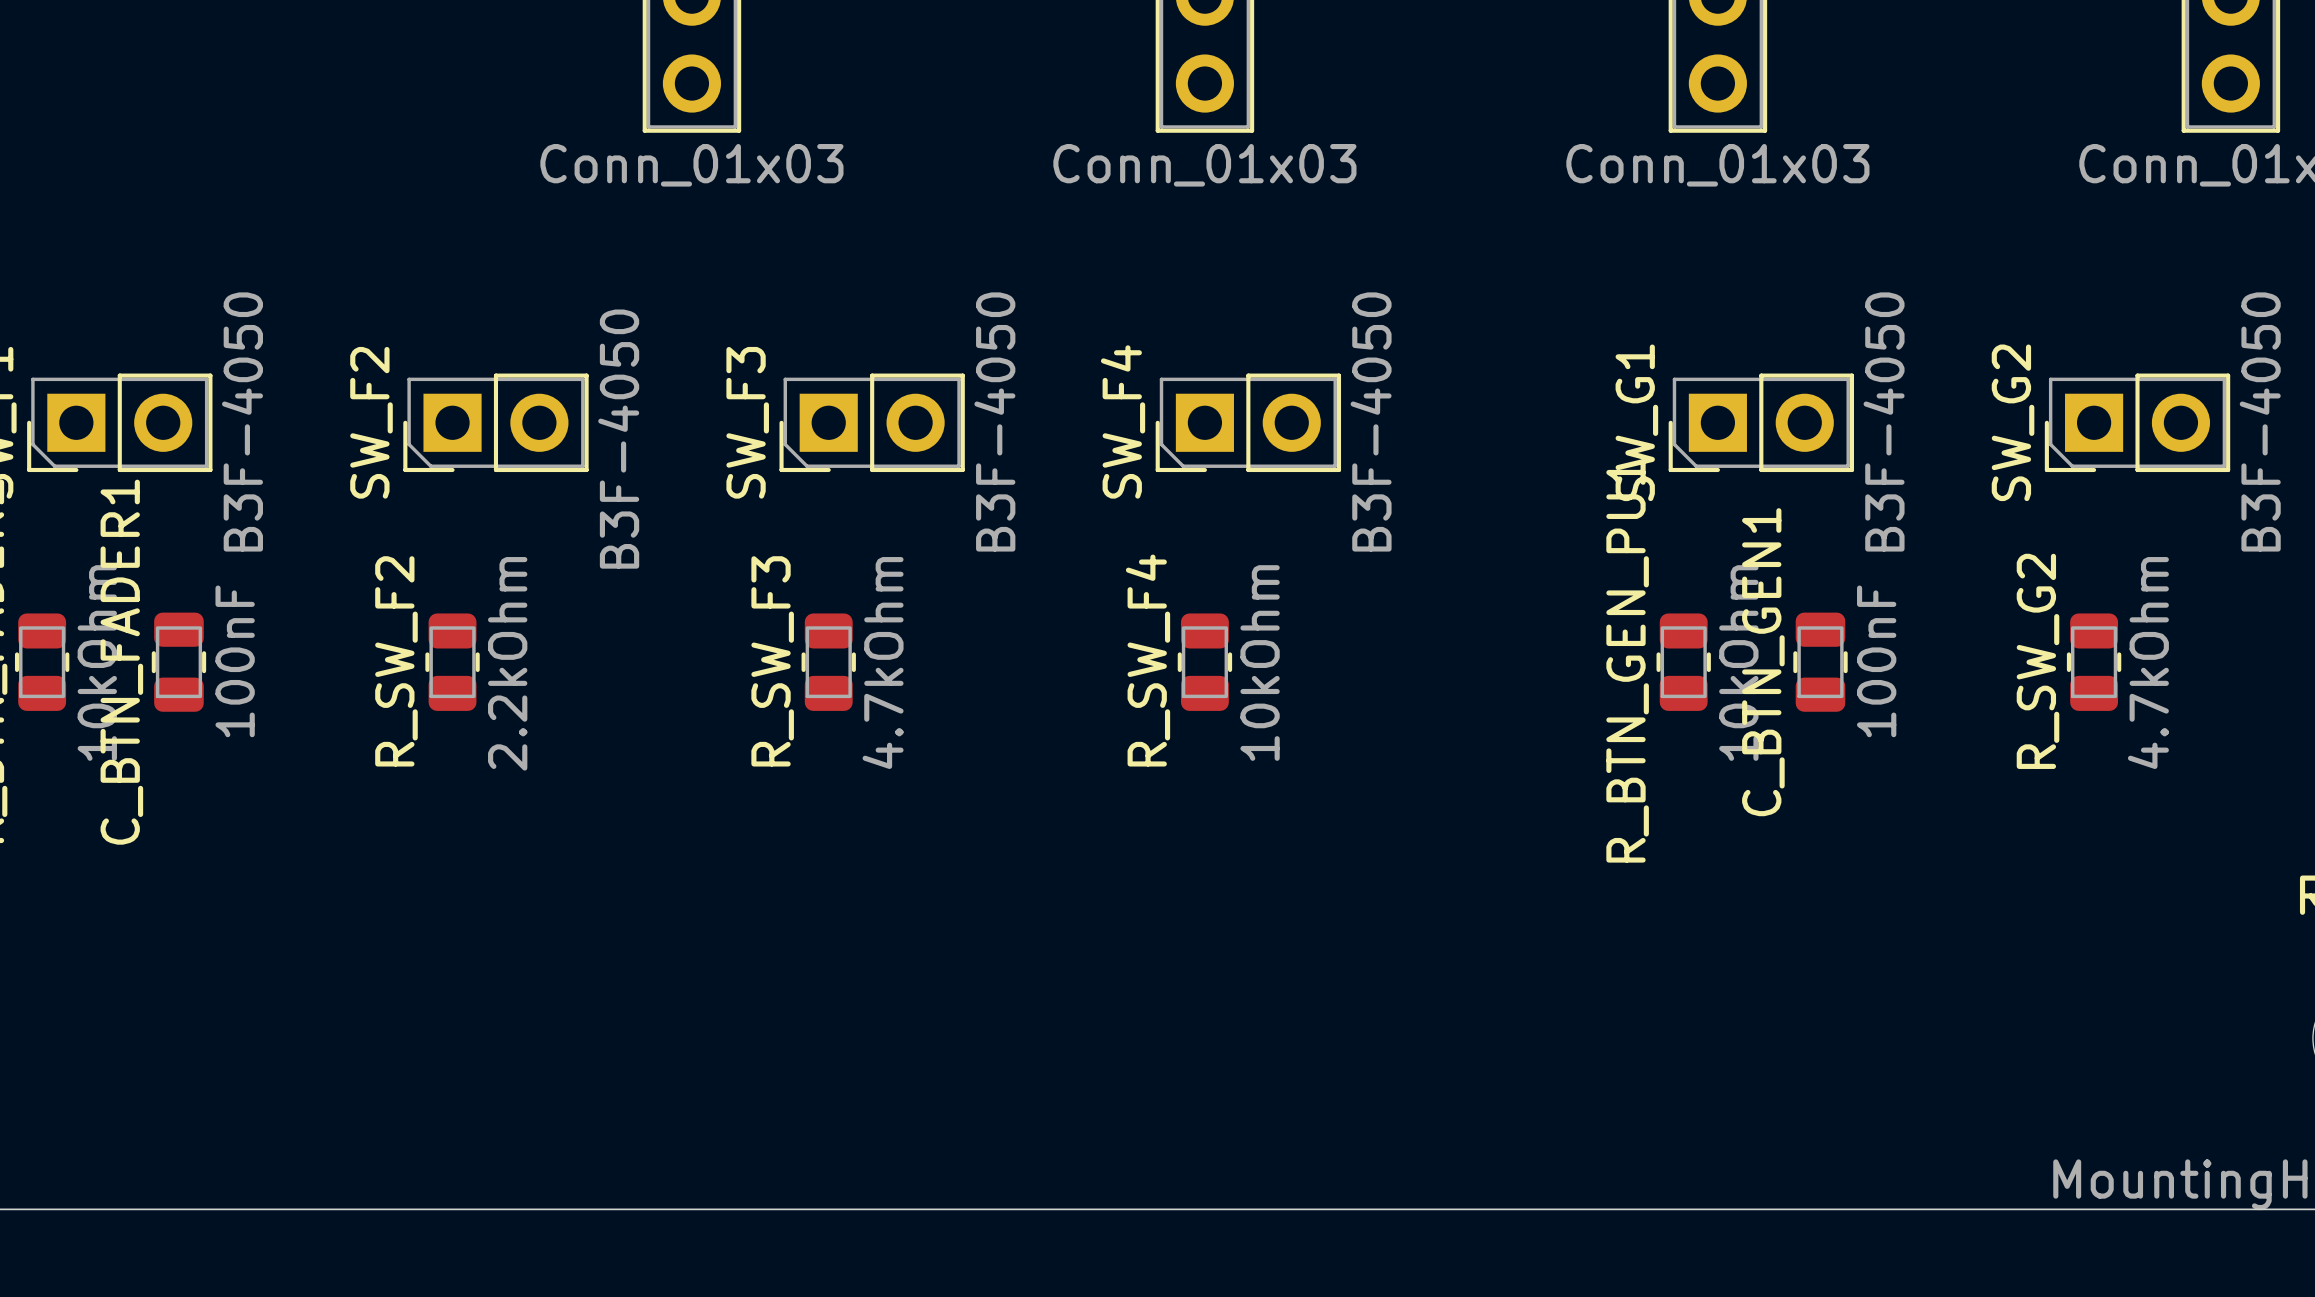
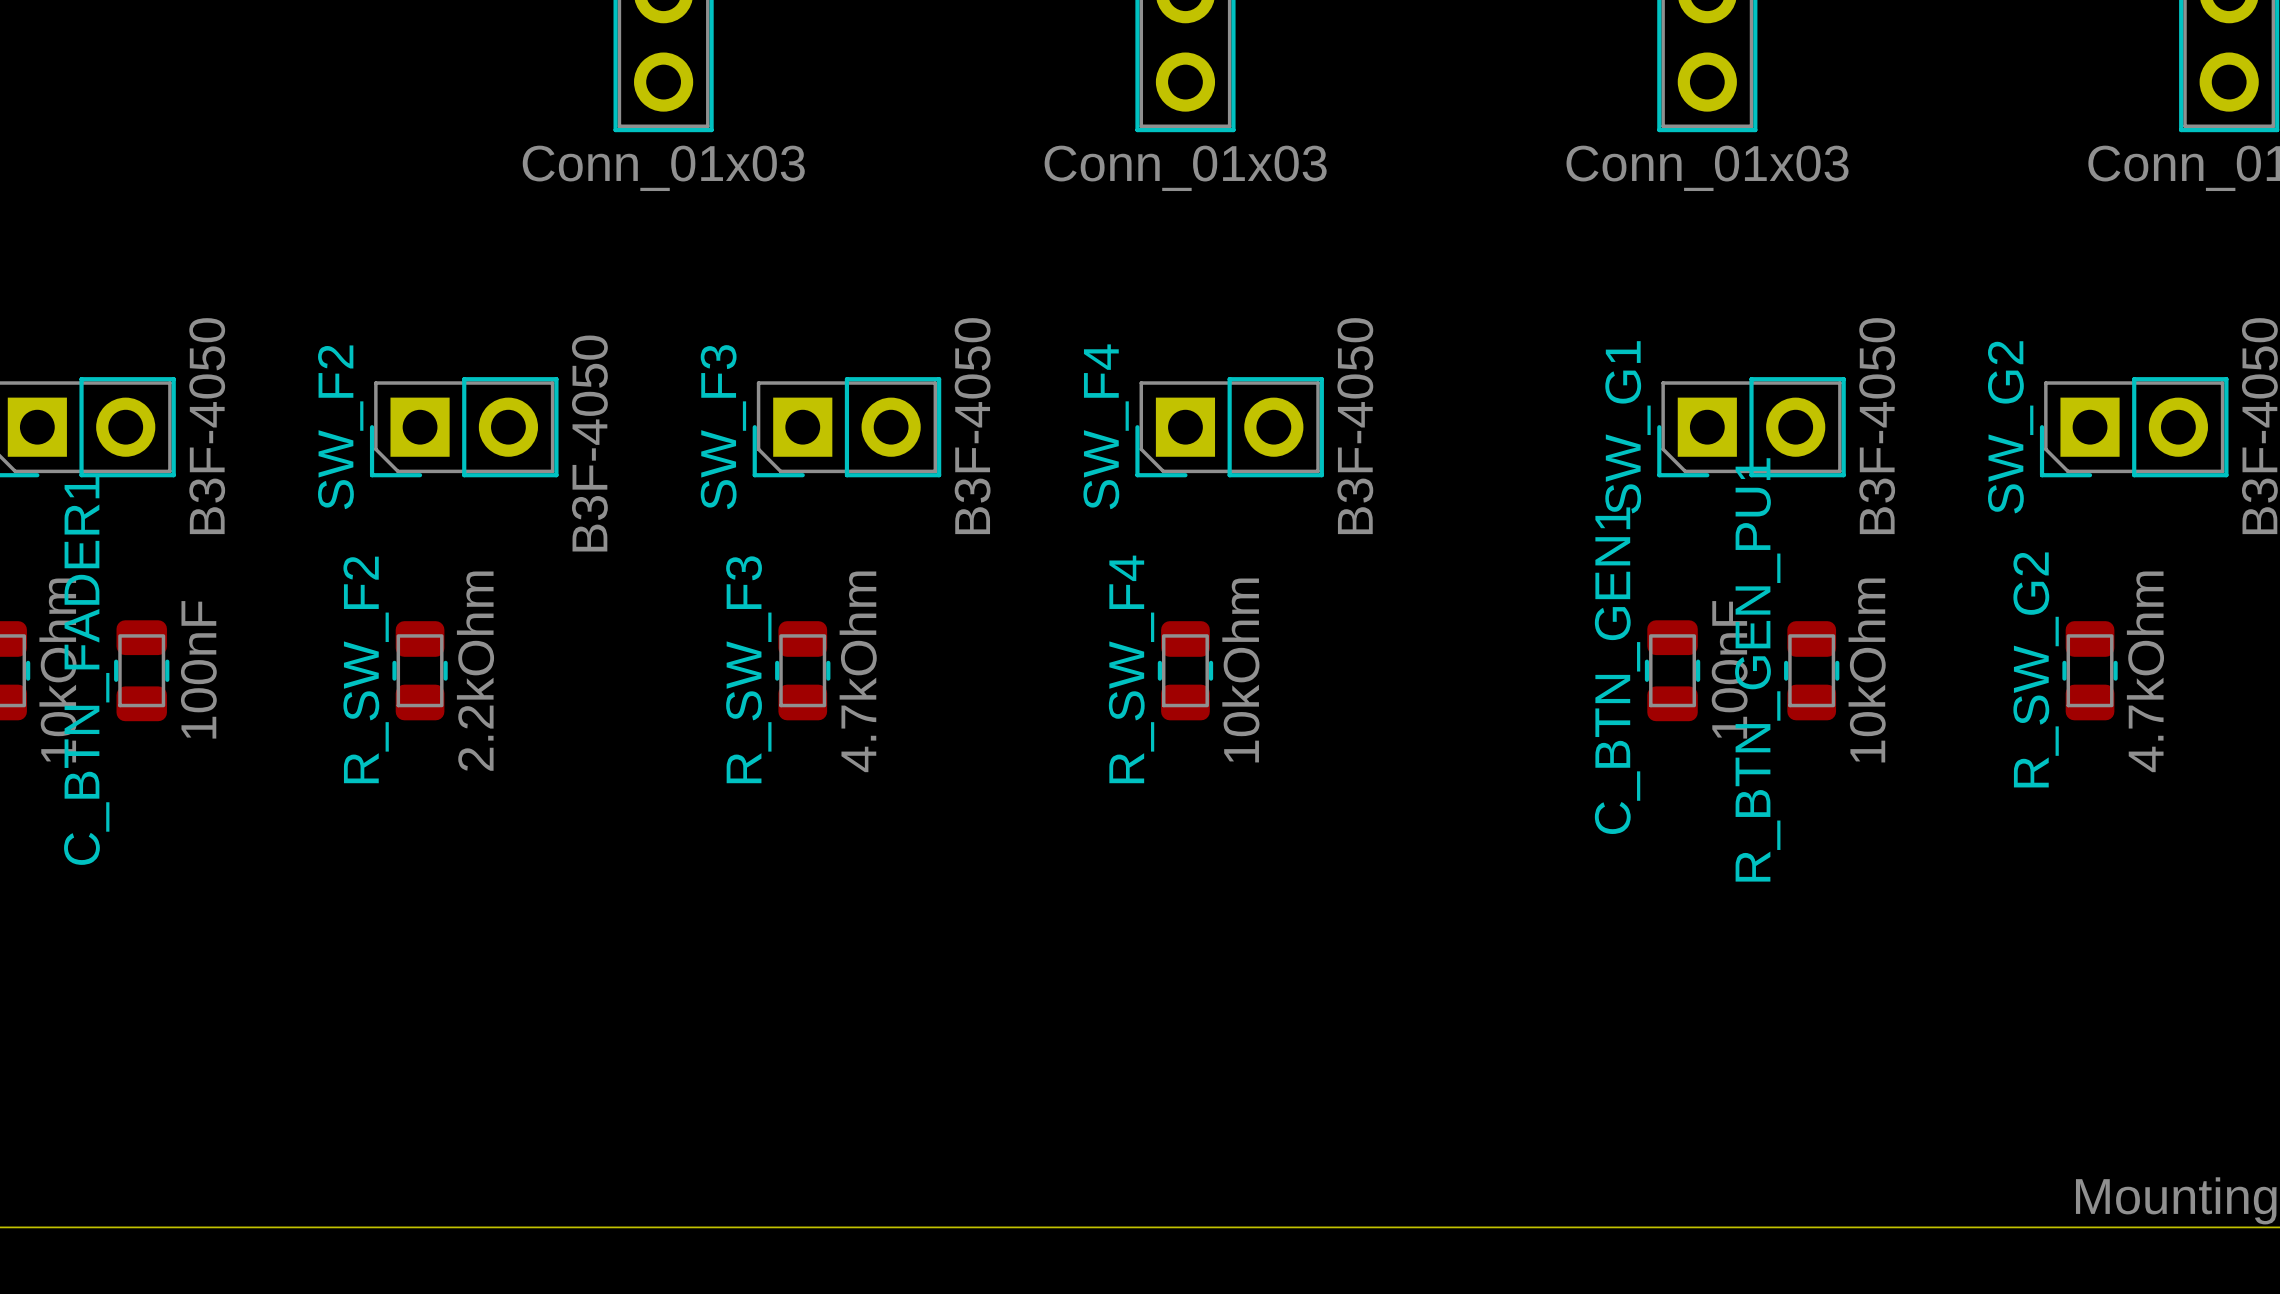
R_BTN_GEN_PU1 position: (1683, 662) -> (1811, 670)
C_BTN_GEN1 position: (1820, 662) -> (1672, 670)

